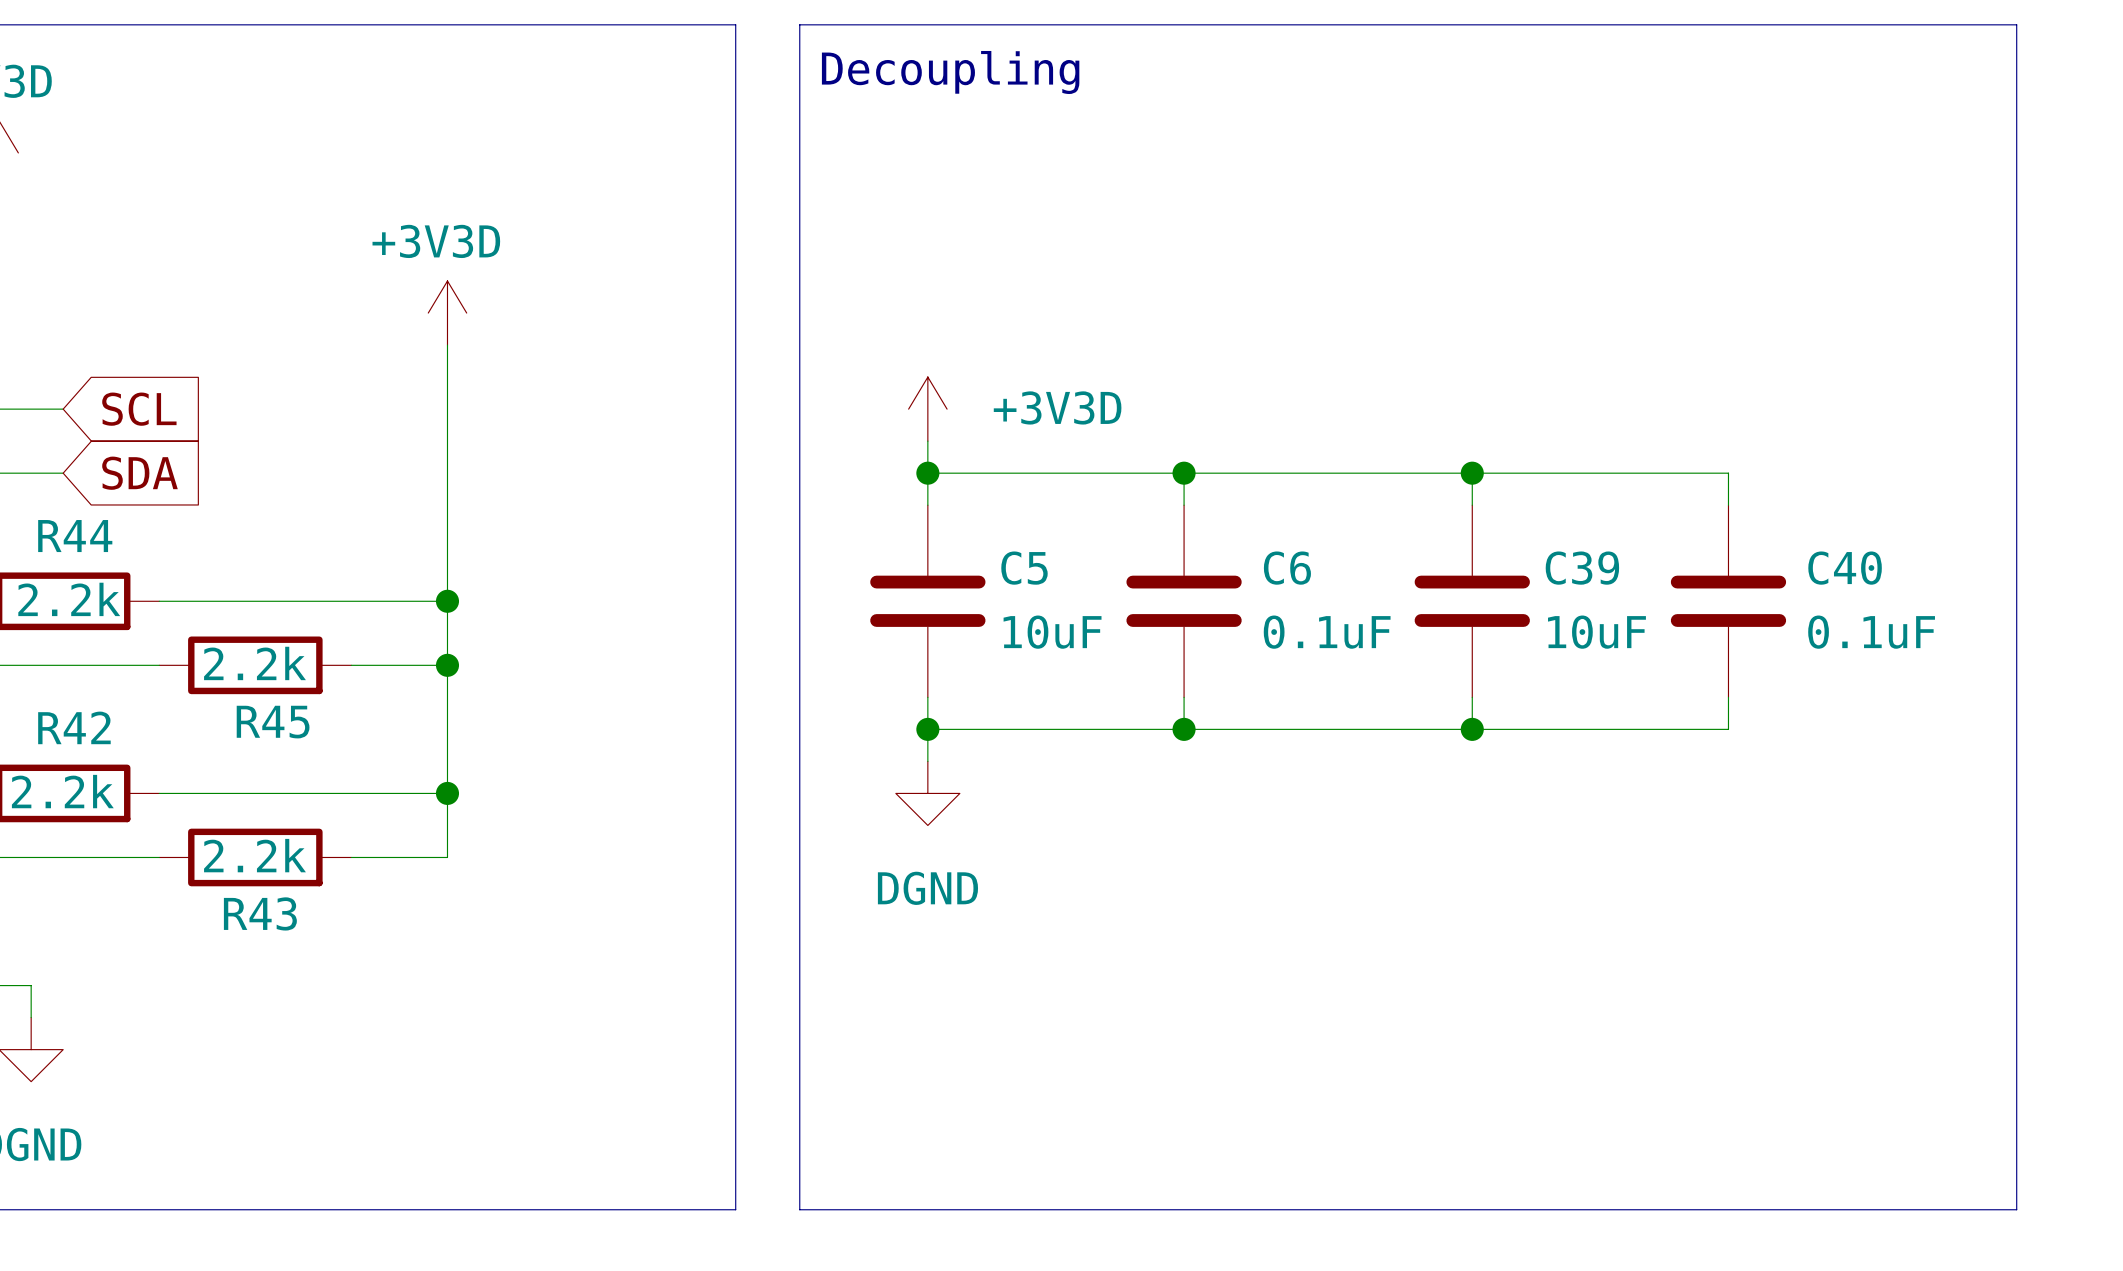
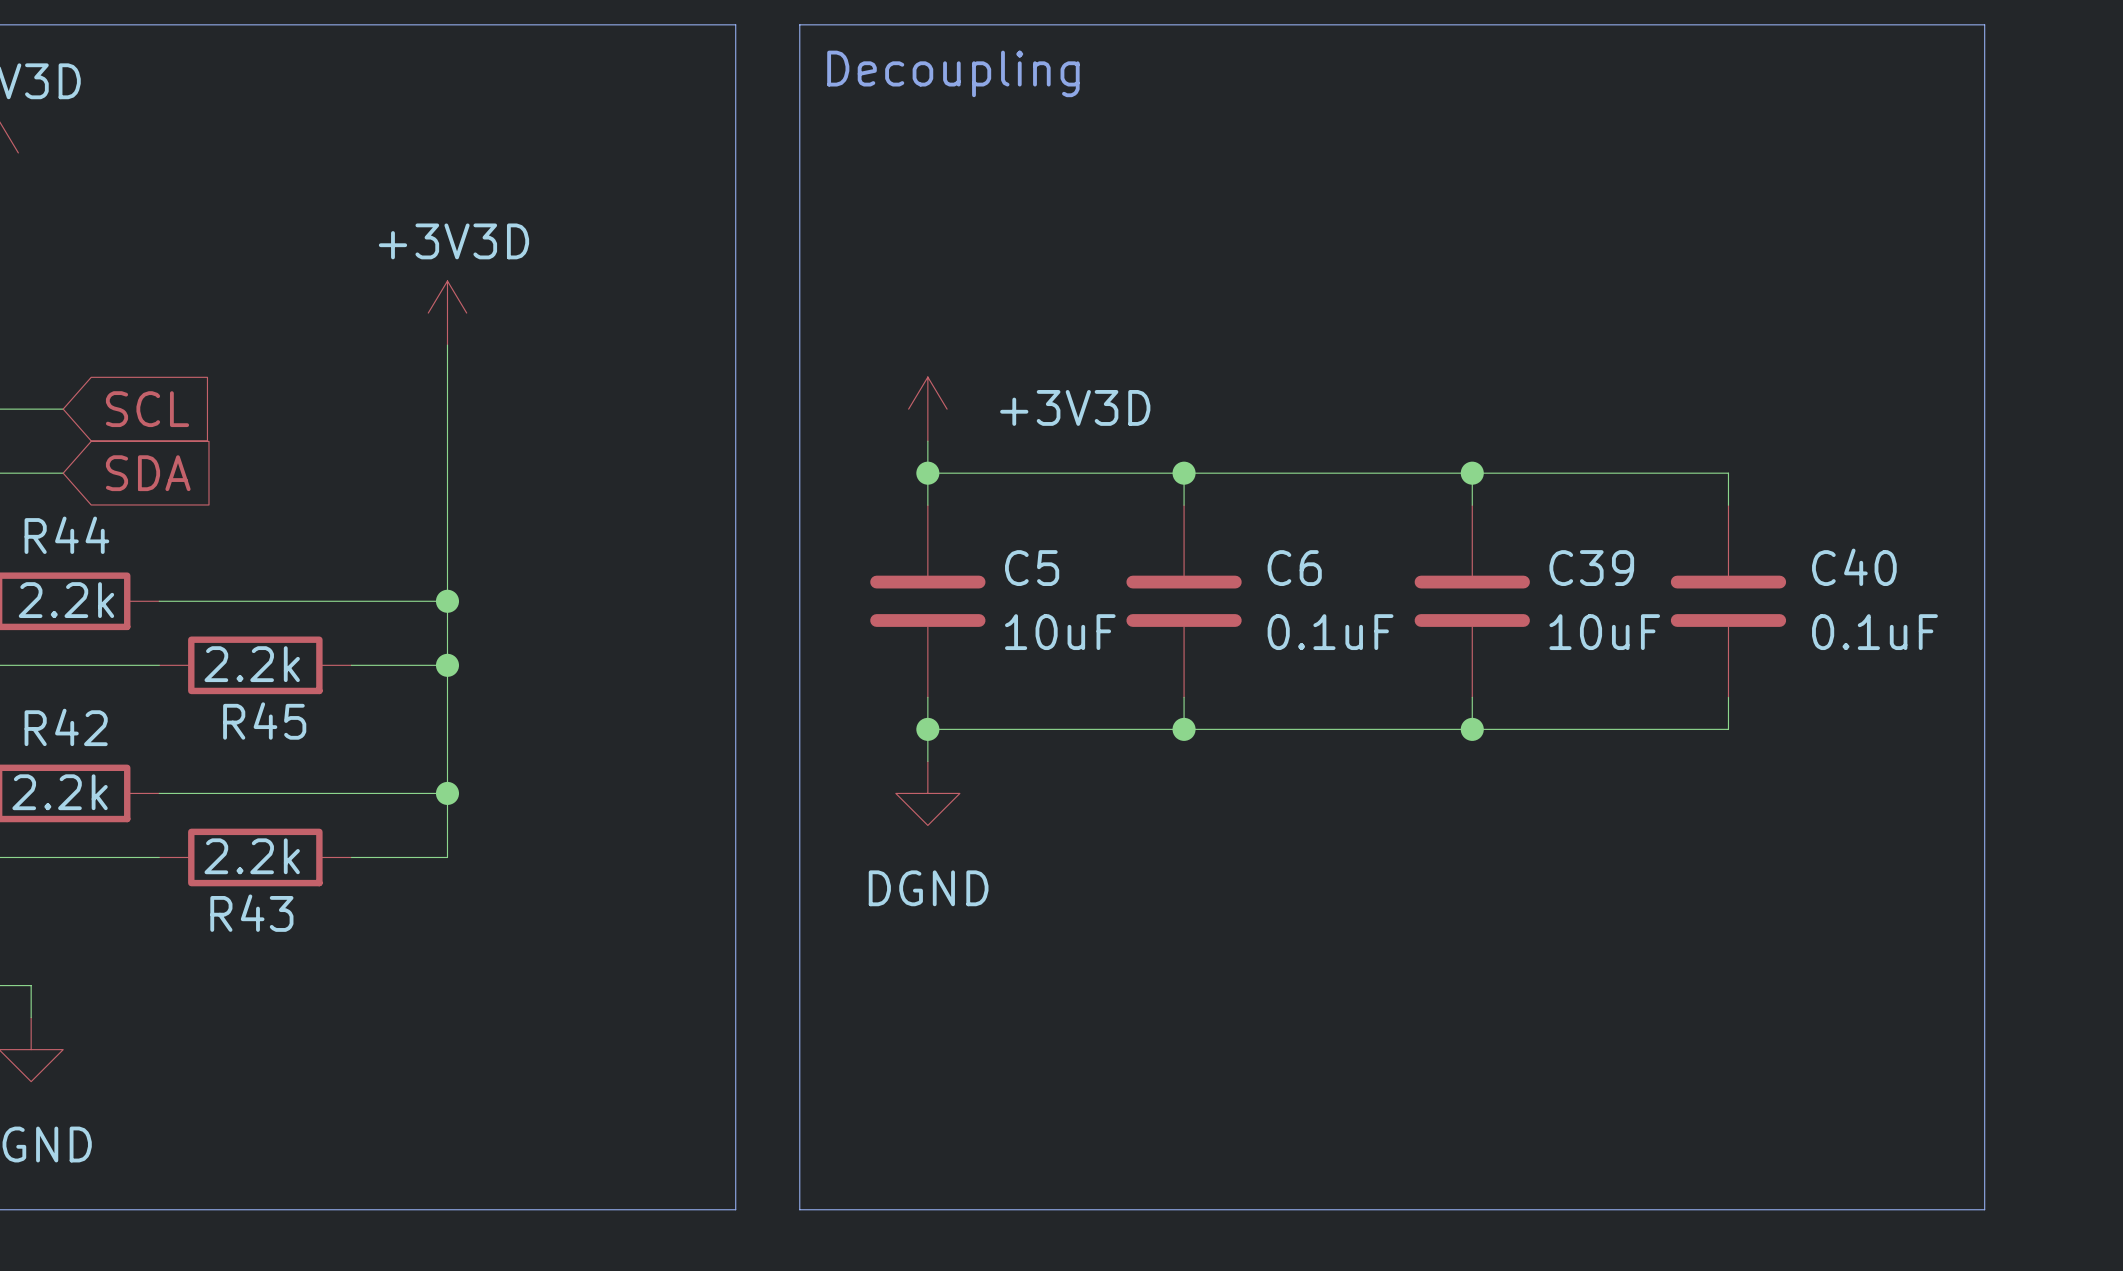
line: (1984, 24) (2016, 24) (2016, 1209) (1984, 1209) -> (1984, 24) (1984, 1209)

